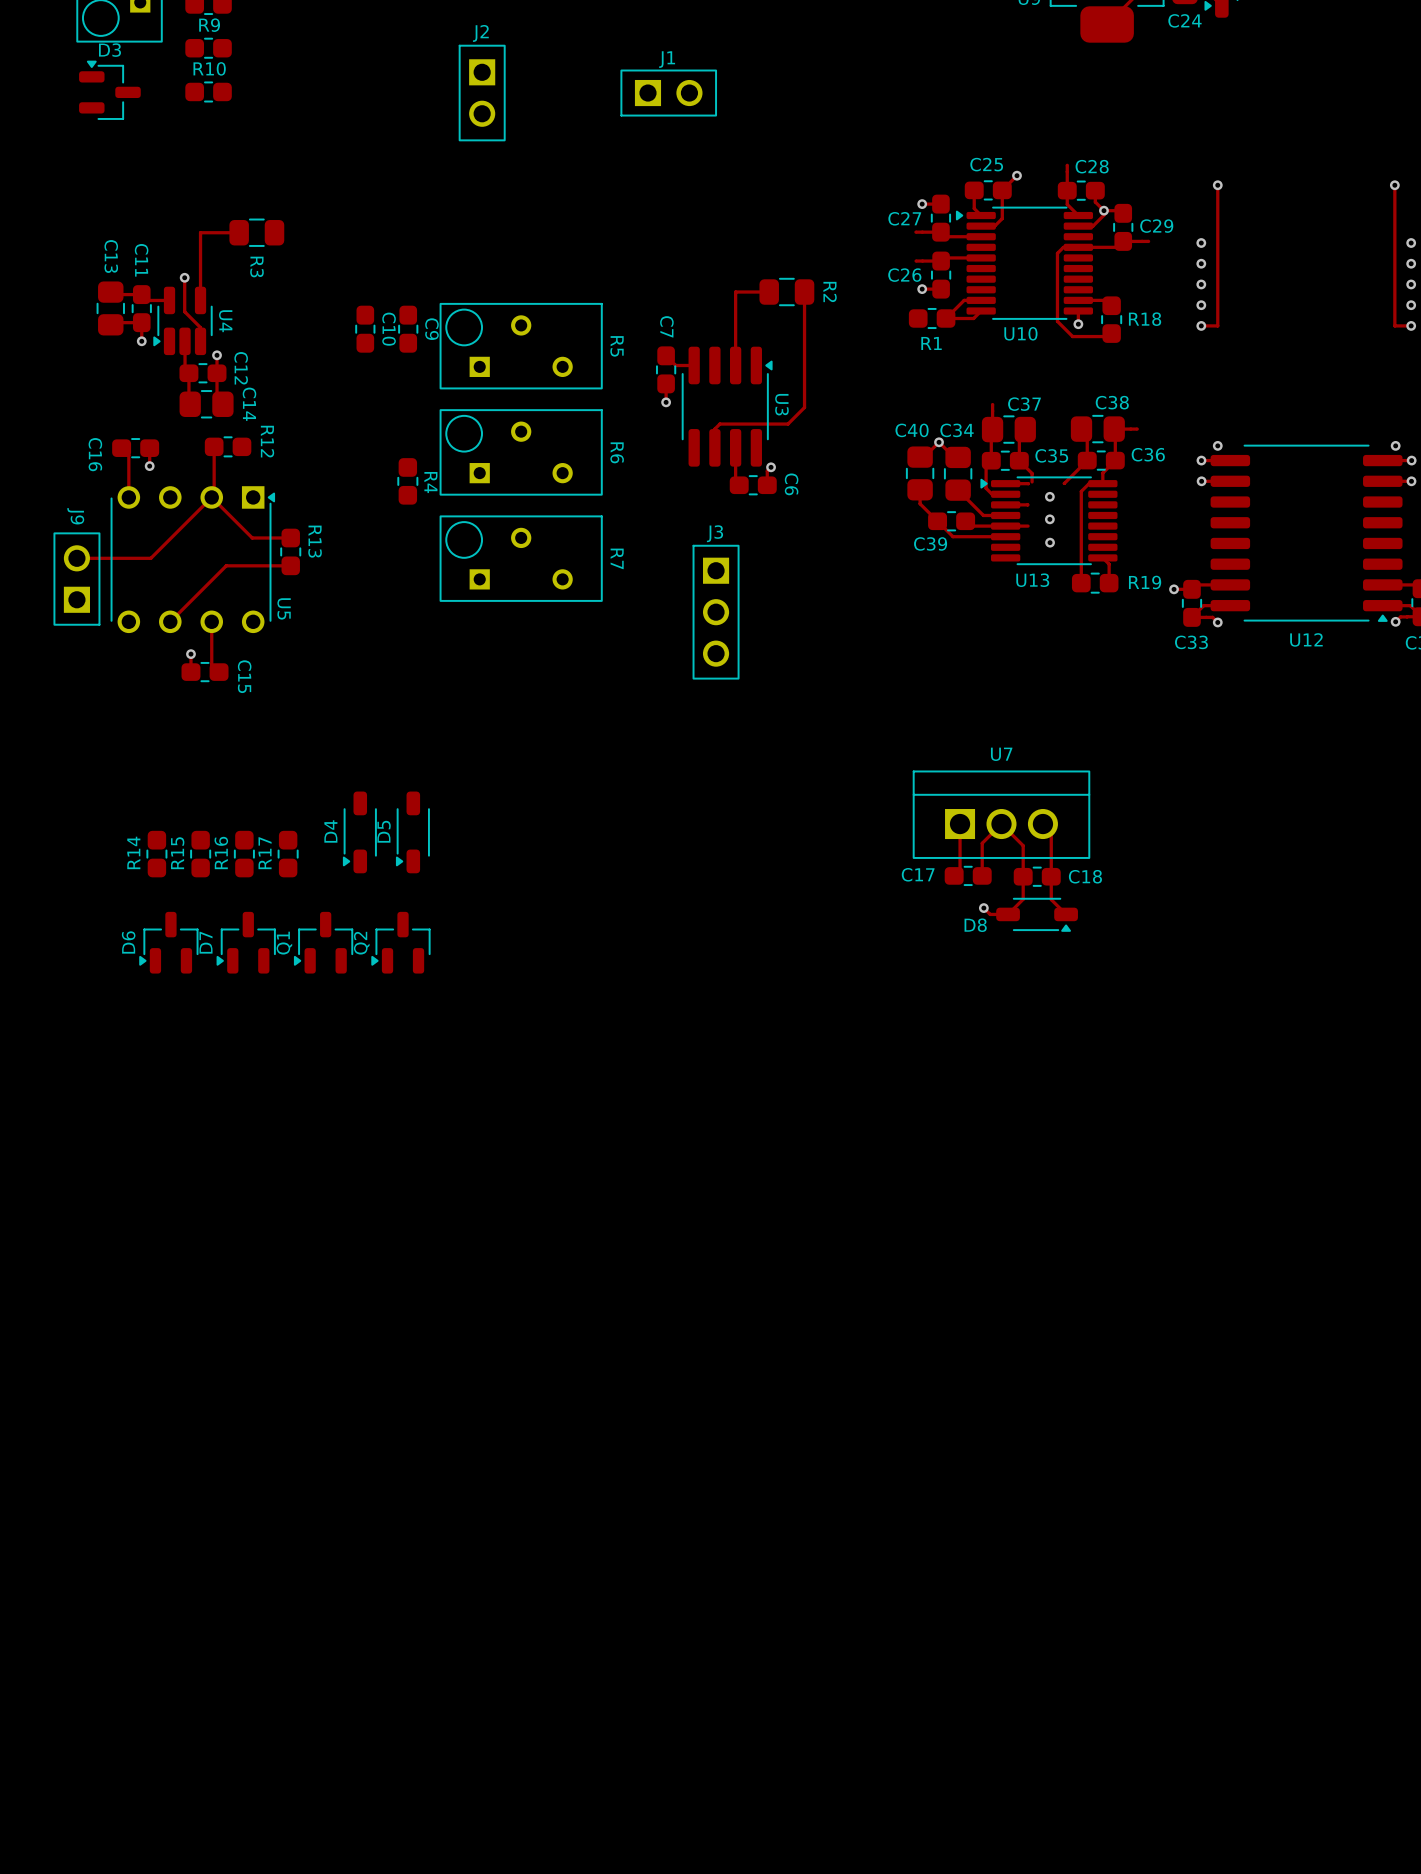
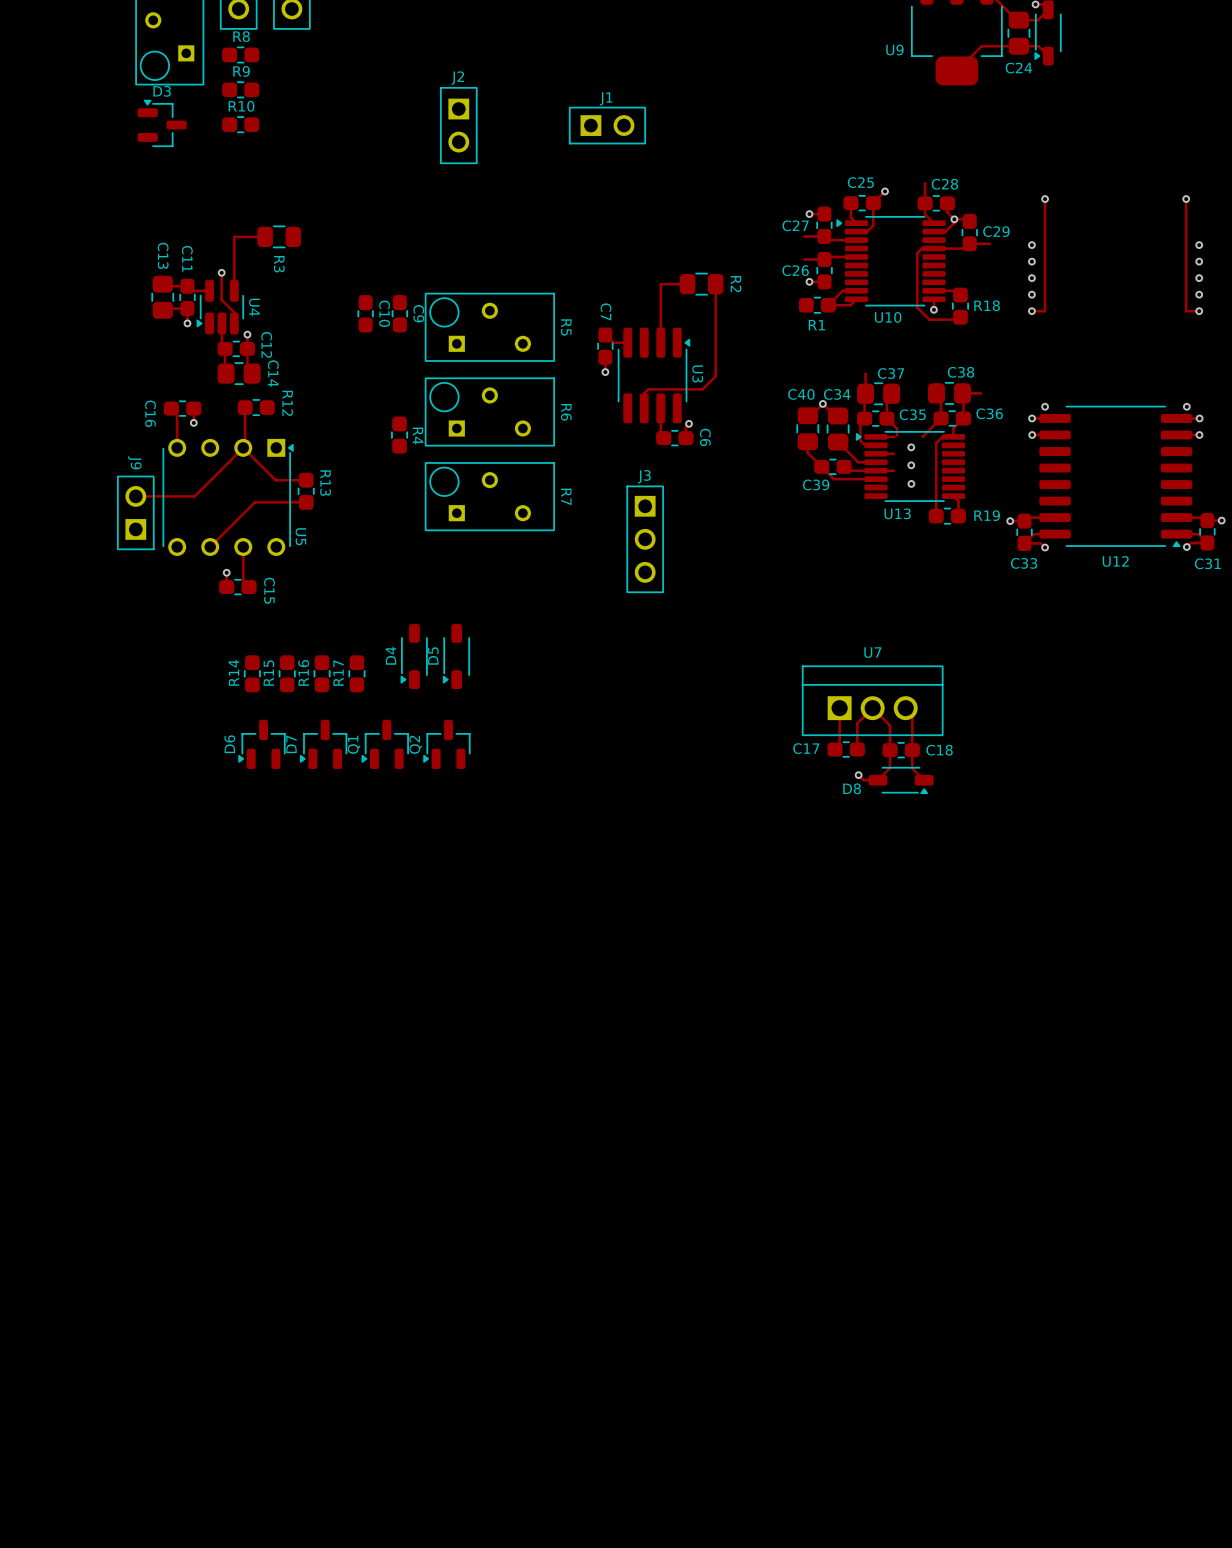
D4 position: (359, 832) -> (414, 656)
D5 position: (412, 832) -> (456, 656)
R14 position: (156, 854) -> (252, 673)
R15 position: (200, 854) -> (287, 673)
R16 position: (244, 854) -> (322, 673)
R17 position: (288, 854) -> (356, 673)
D6 position: (168, 942) -> (261, 744)
D7 position: (246, 942) -> (323, 744)
Q1 position: (323, 942) -> (385, 744)
Q2 position: (400, 942) -> (446, 744)

